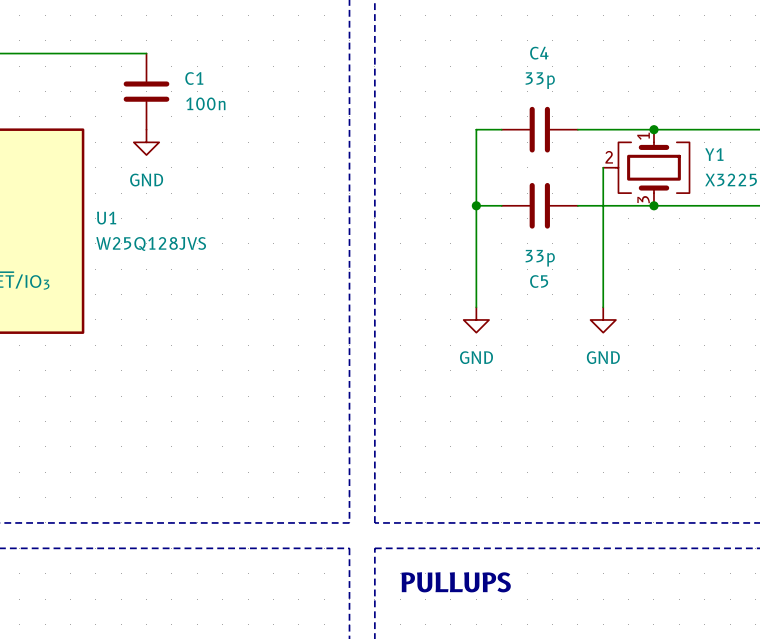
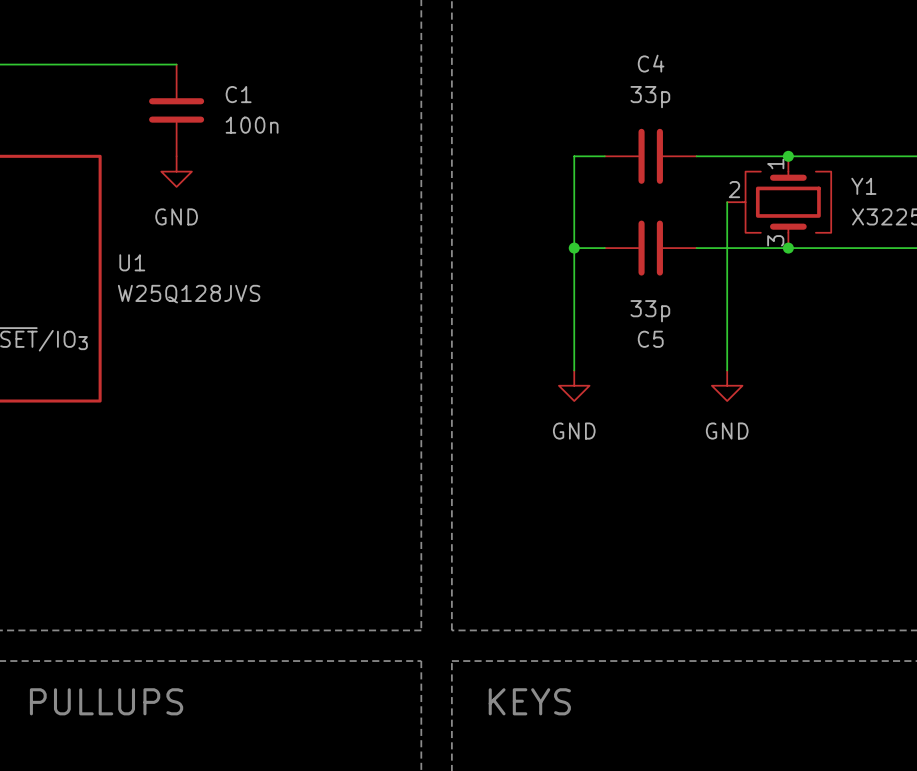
text: none -> PULLUPS (106, 701)
text: PULLUPS (456, 582) -> KEYS (529, 701)

